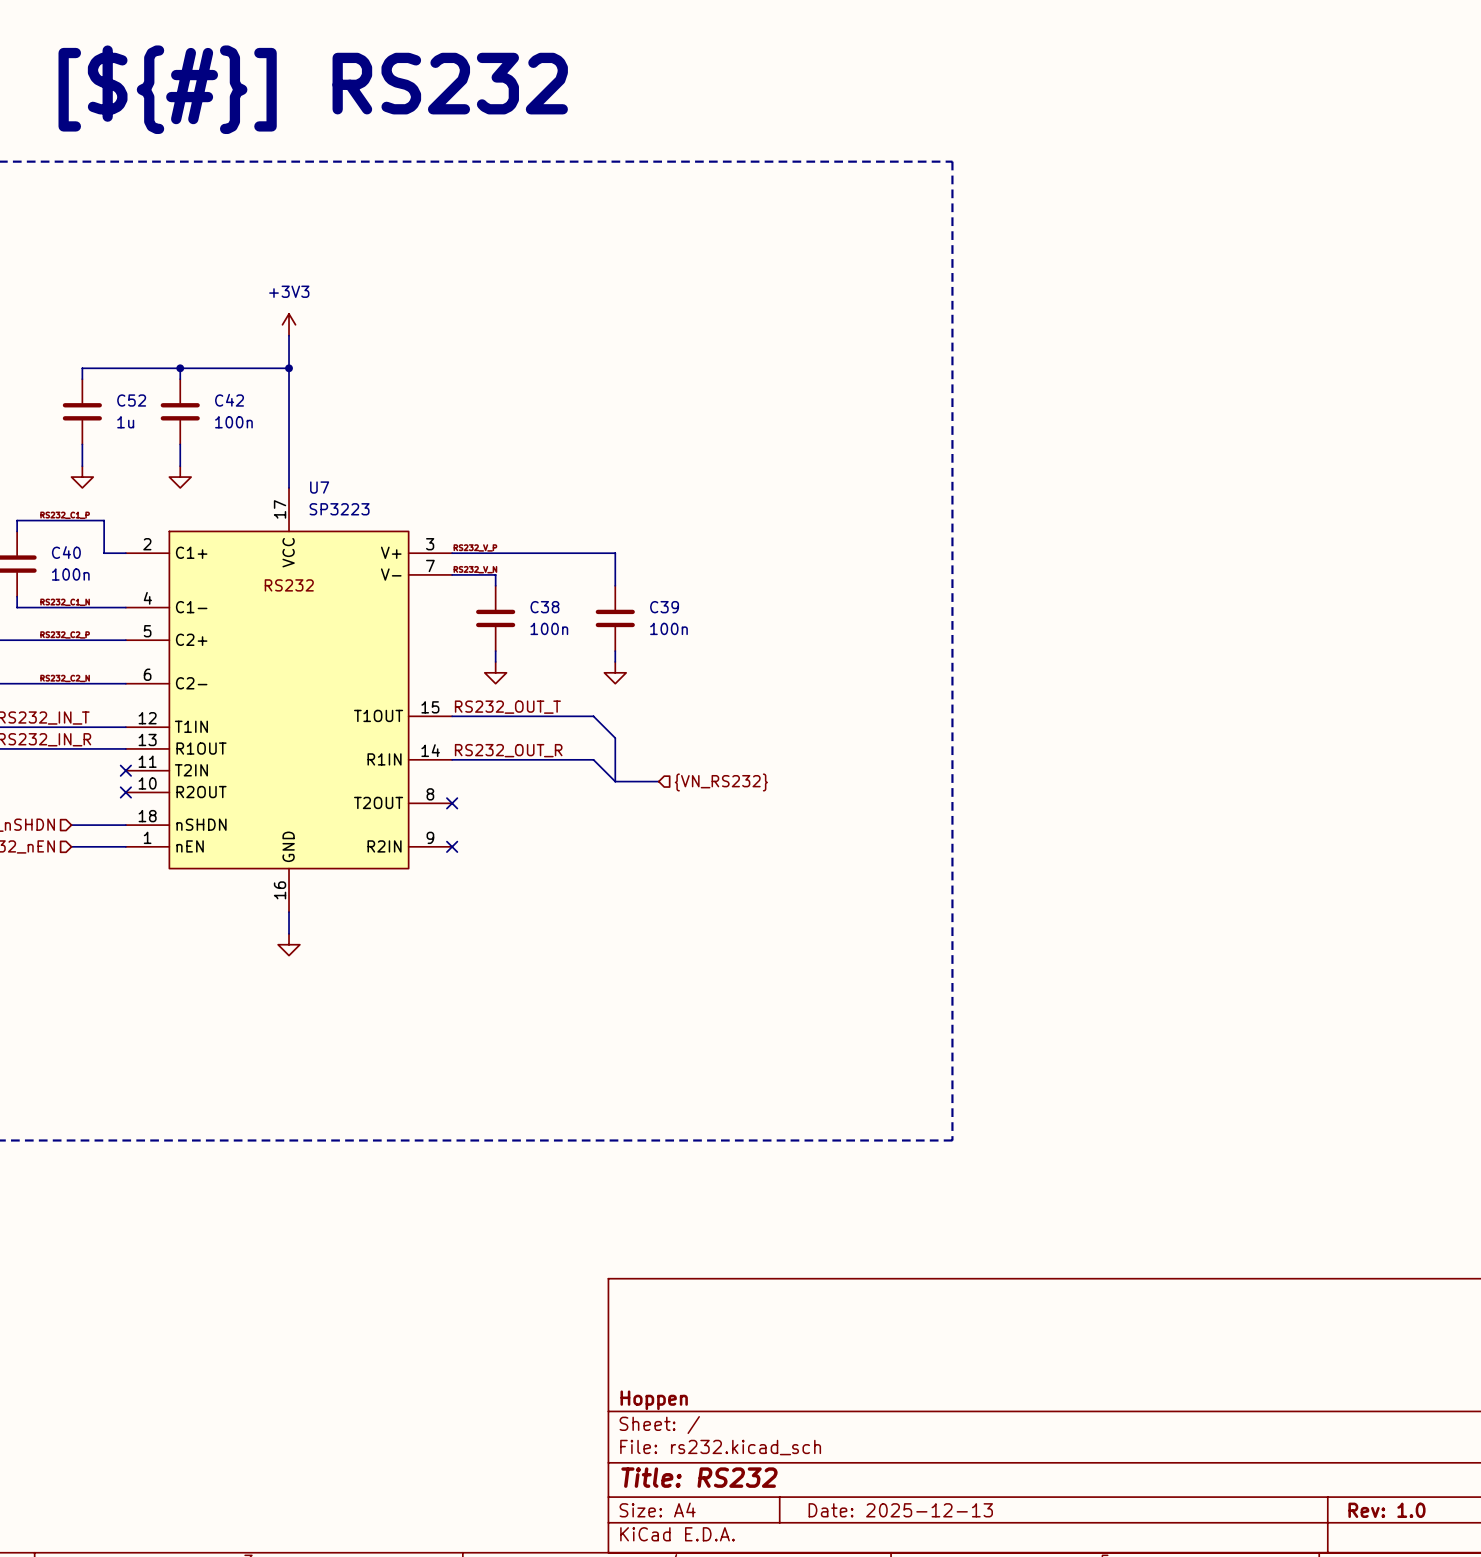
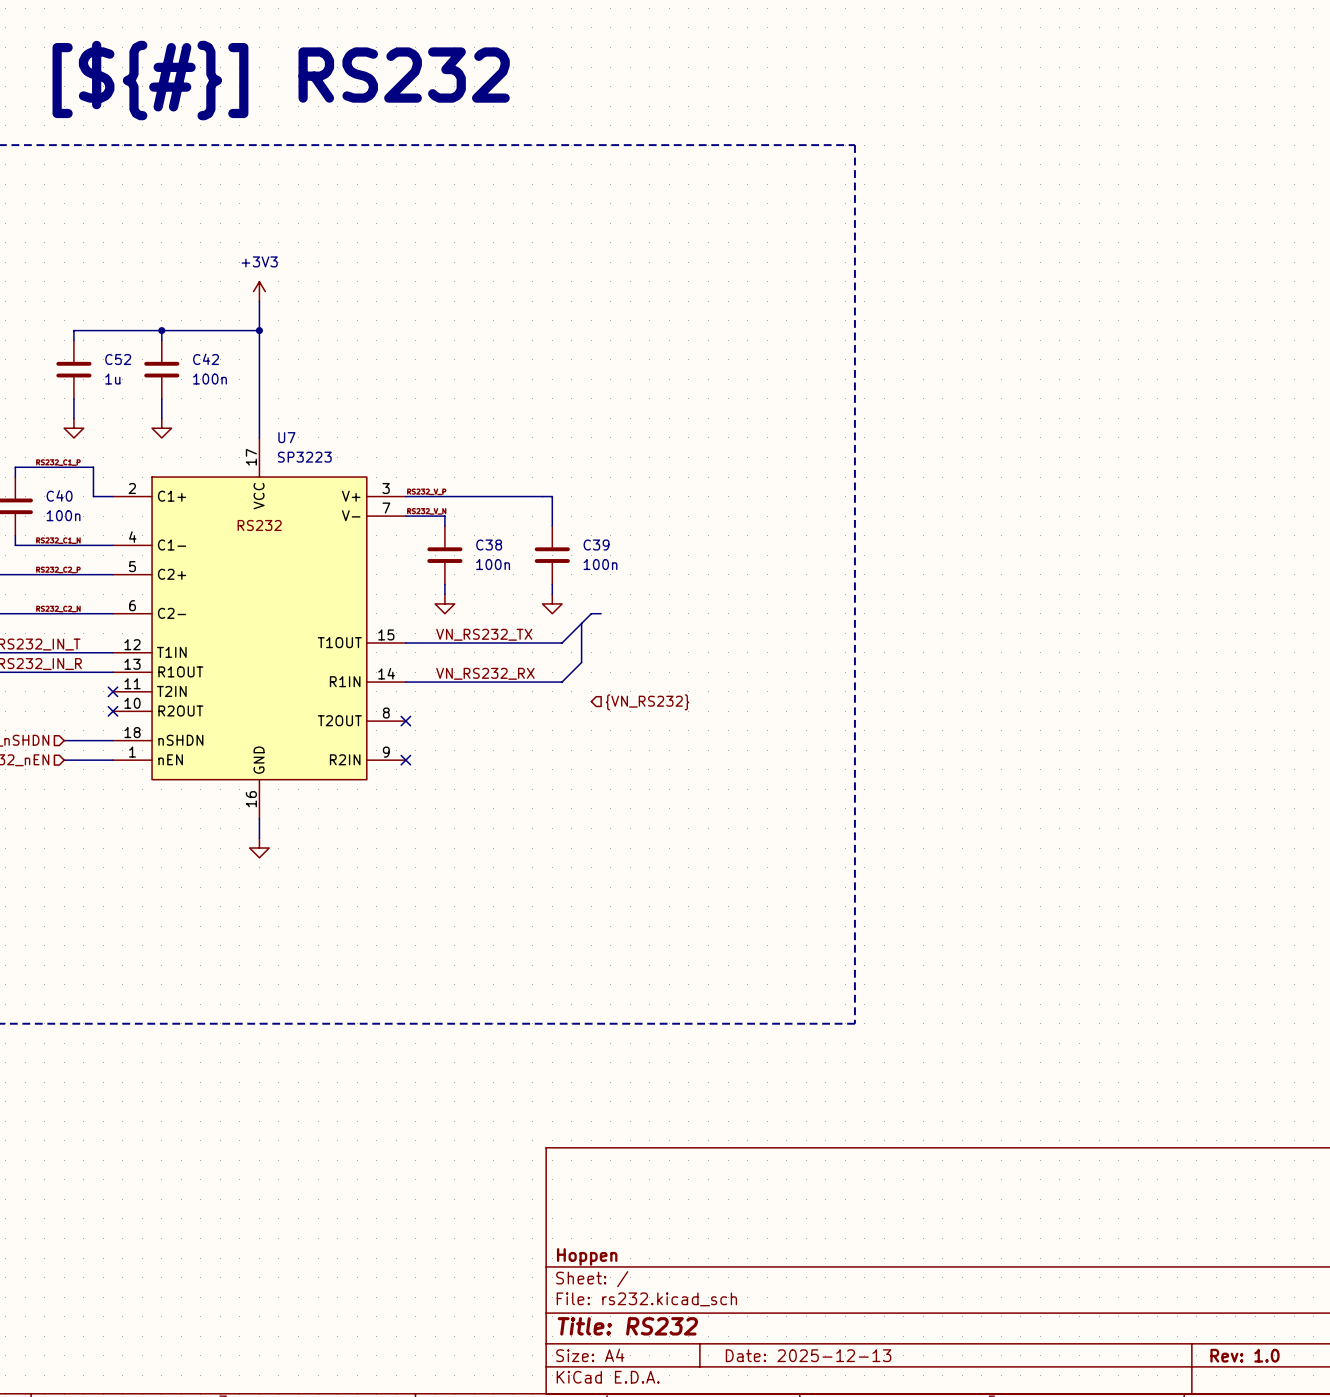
bus: none -> (601, 613) (591, 613) (581, 623) (581, 662)
label: RS232_OUT_T (507, 707) -> VN_RS232_TX (484, 634)
wire: (593, 716) (615, 738) -> (532, 643) (562, 643) (581, 623)
bus: (615, 738) (615, 781) (658, 781) -> none
label: RS232_OUT_R (508, 750) -> VN_RS232_RX (485, 673)
wire: (593, 759) (615, 781) -> (532, 682) (562, 682) (581, 662)

